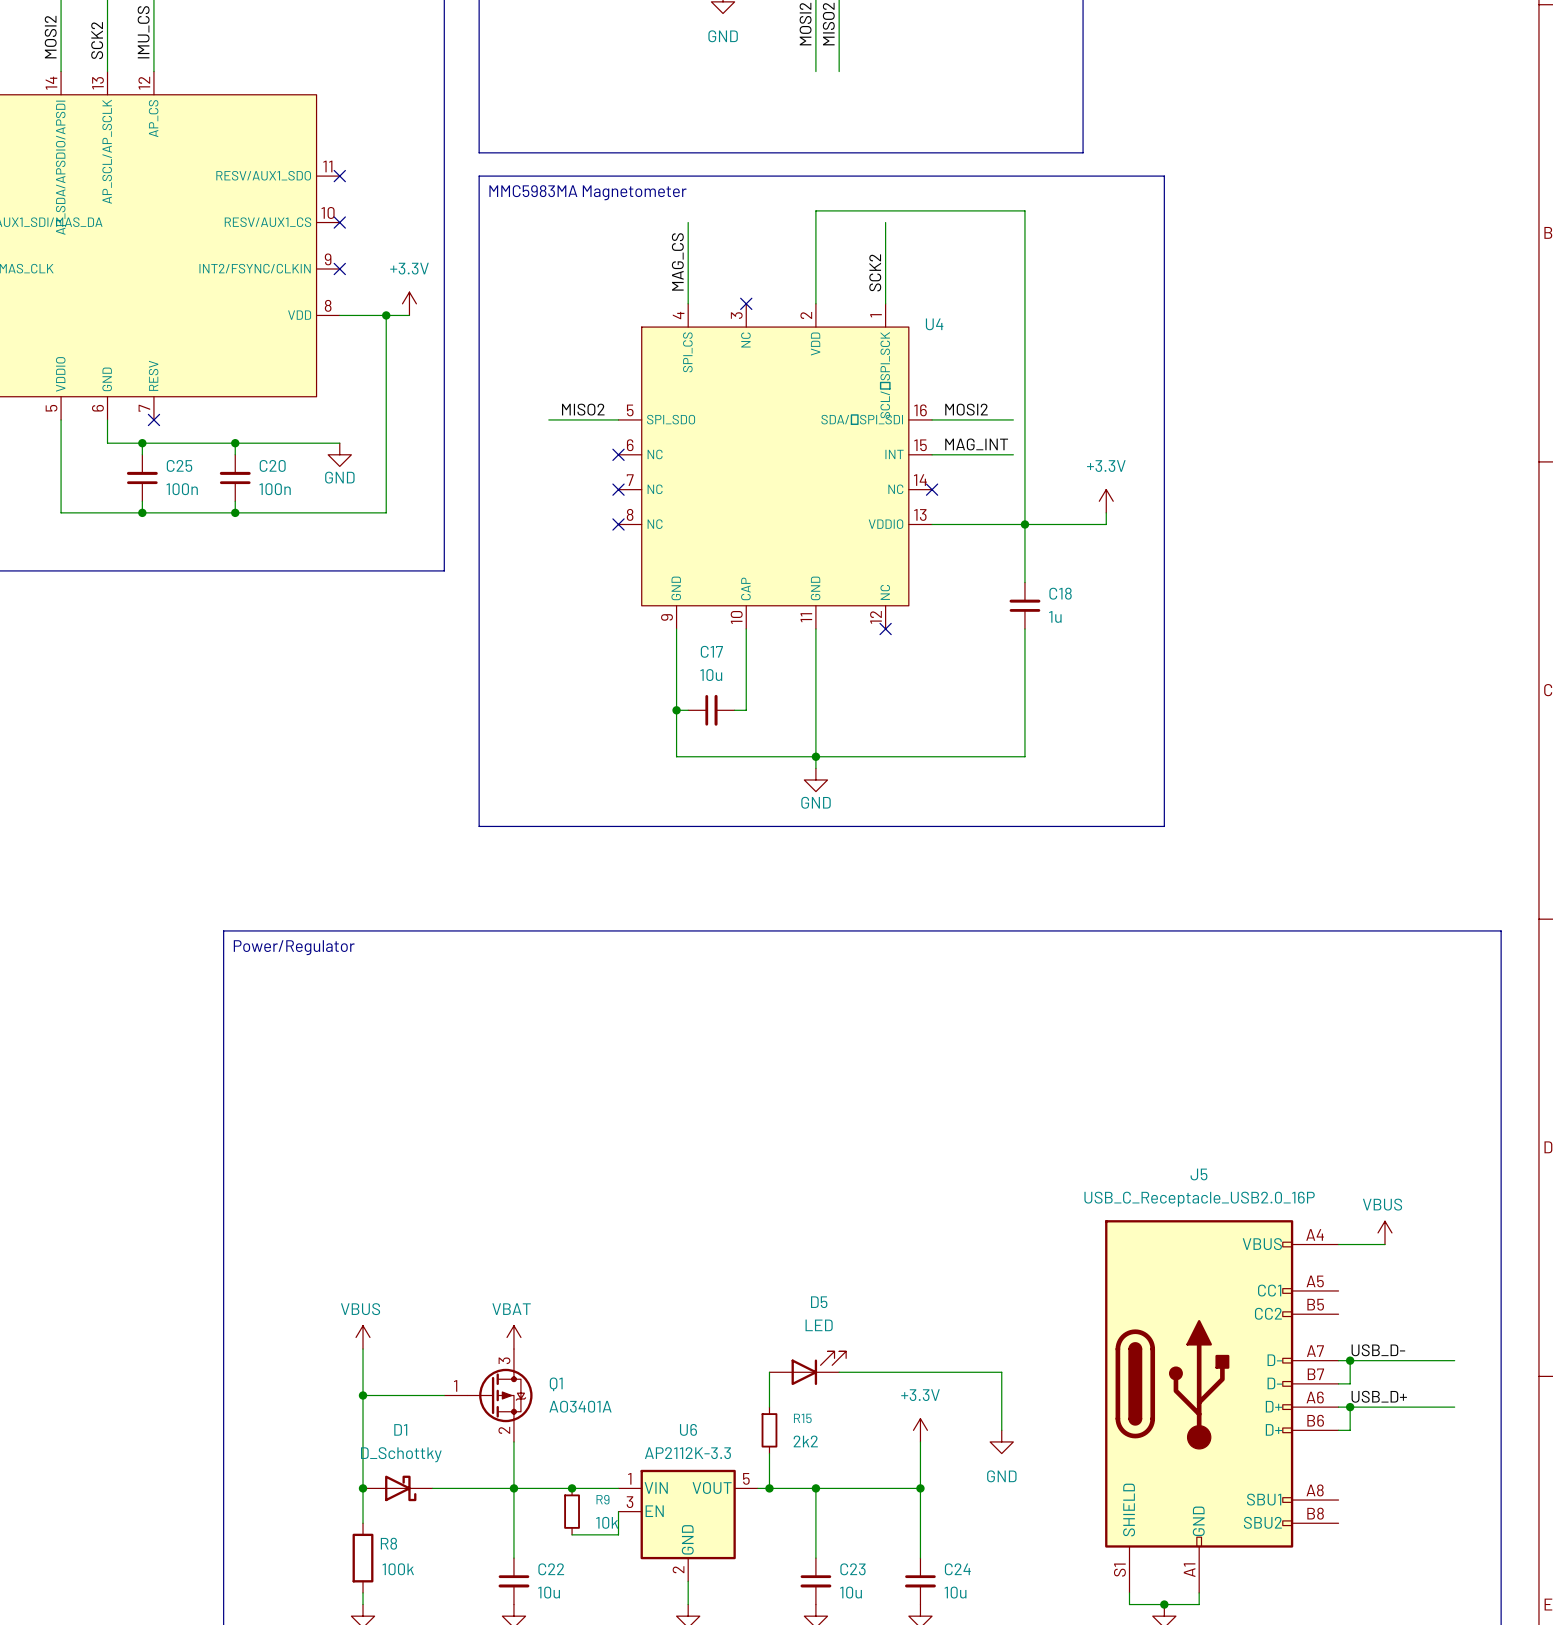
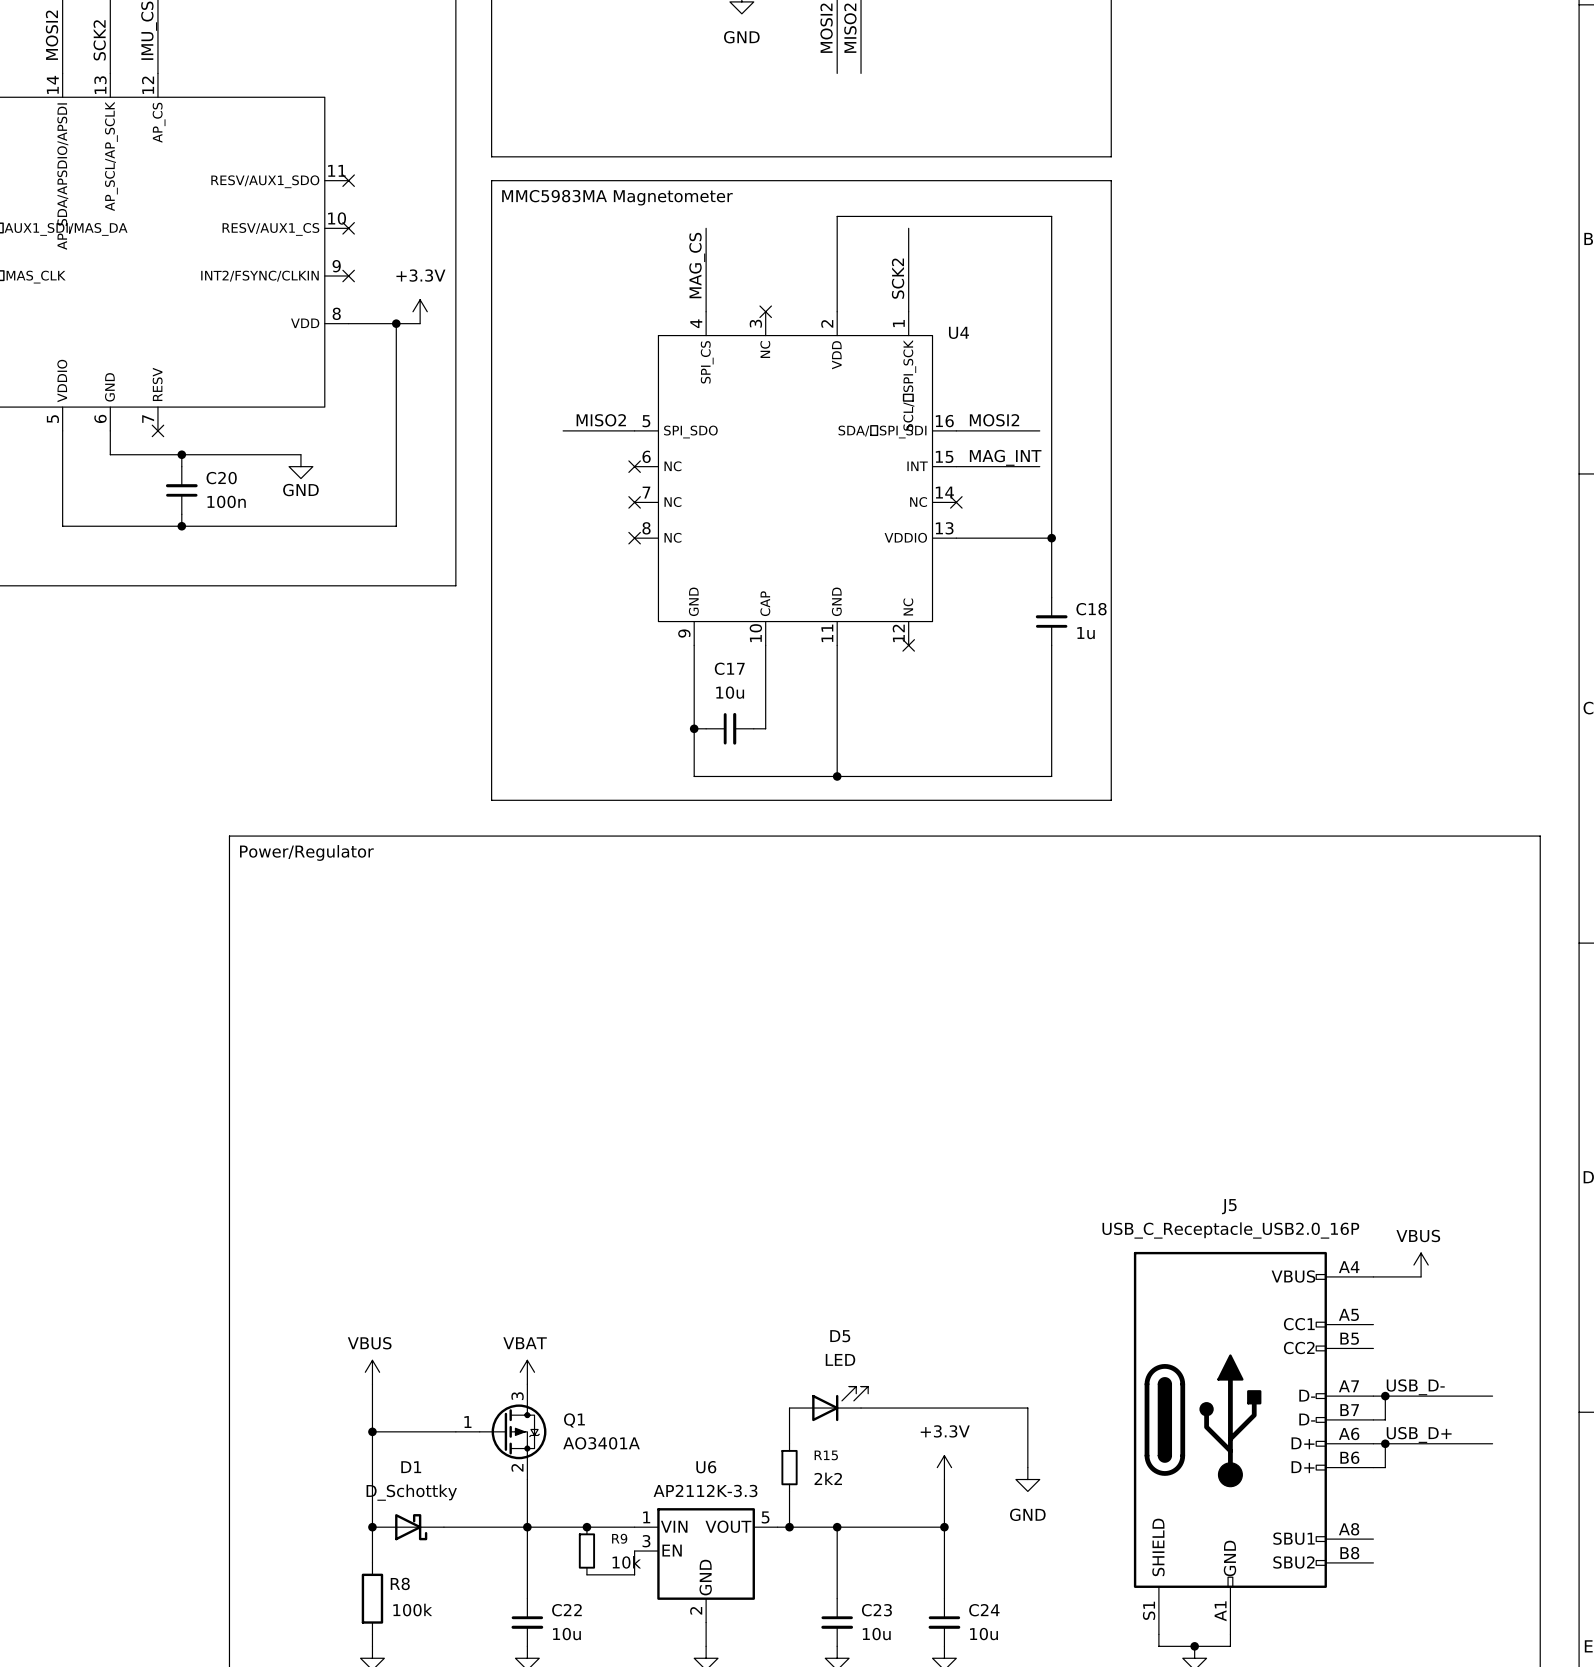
line: (1083, 176) (1164, 176) (1164, 826) (479, 826) (479, 779) -> (1111, 180) (1111, 800) (491, 800)
wire: (142, 443) (142, 454) -> (181, 454) (181, 466)
junction: (142, 443) -> none
junction: none -> (181, 454)
wire: (235, 443) (235, 454) -> none
junction: (235, 443) -> none
wire: (293, 443) (339, 443) -> none
power symbol position: GND (339, 454) -> GND (300, 466)
C25: 100n (142, 478) -> none
C20 position: (235, 478) -> (181, 490)
wire: (142, 501) (142, 512) -> (181, 514) (181, 526)
wire: (235, 501) (235, 512) -> none
power symbol: +3.3V (1106, 501) -> none
junction: (142, 512) -> none
junction: none -> (181, 526)
junction: (235, 512) -> none
wire: (1106, 512) (1106, 524) (1024, 524) -> none
wire: (815, 756) (815, 768) -> none
power symbol: GND (815, 779) -> none
line: (223, 930) (1501, 930) -> (229, 955) (229, 836) (1540, 836) (1540, 955)
text position: Power/Regulator (294, 947) -> Power/Regulator (306, 852)

